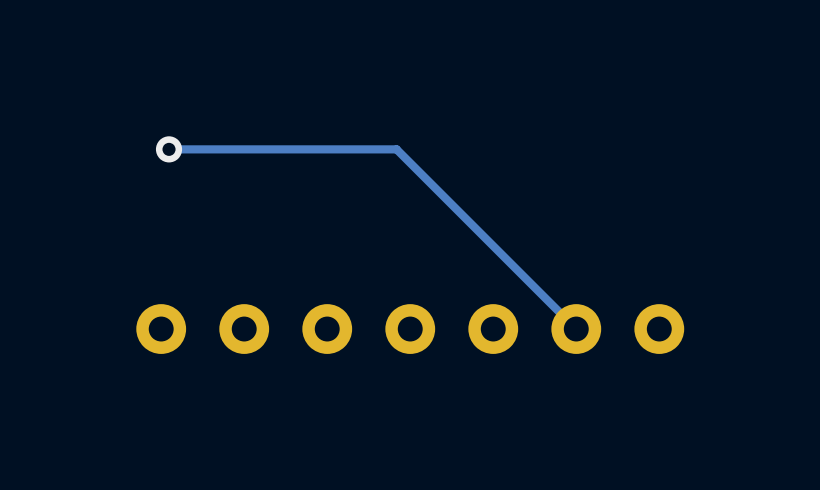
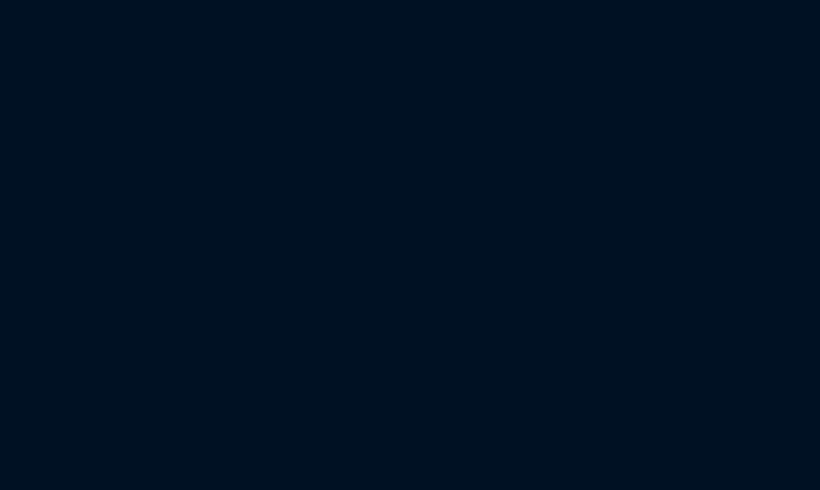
track: (169, 149) (396, 149) (576, 329) -> none
via: (169, 149) -> none
part: (410, 329) -> none

